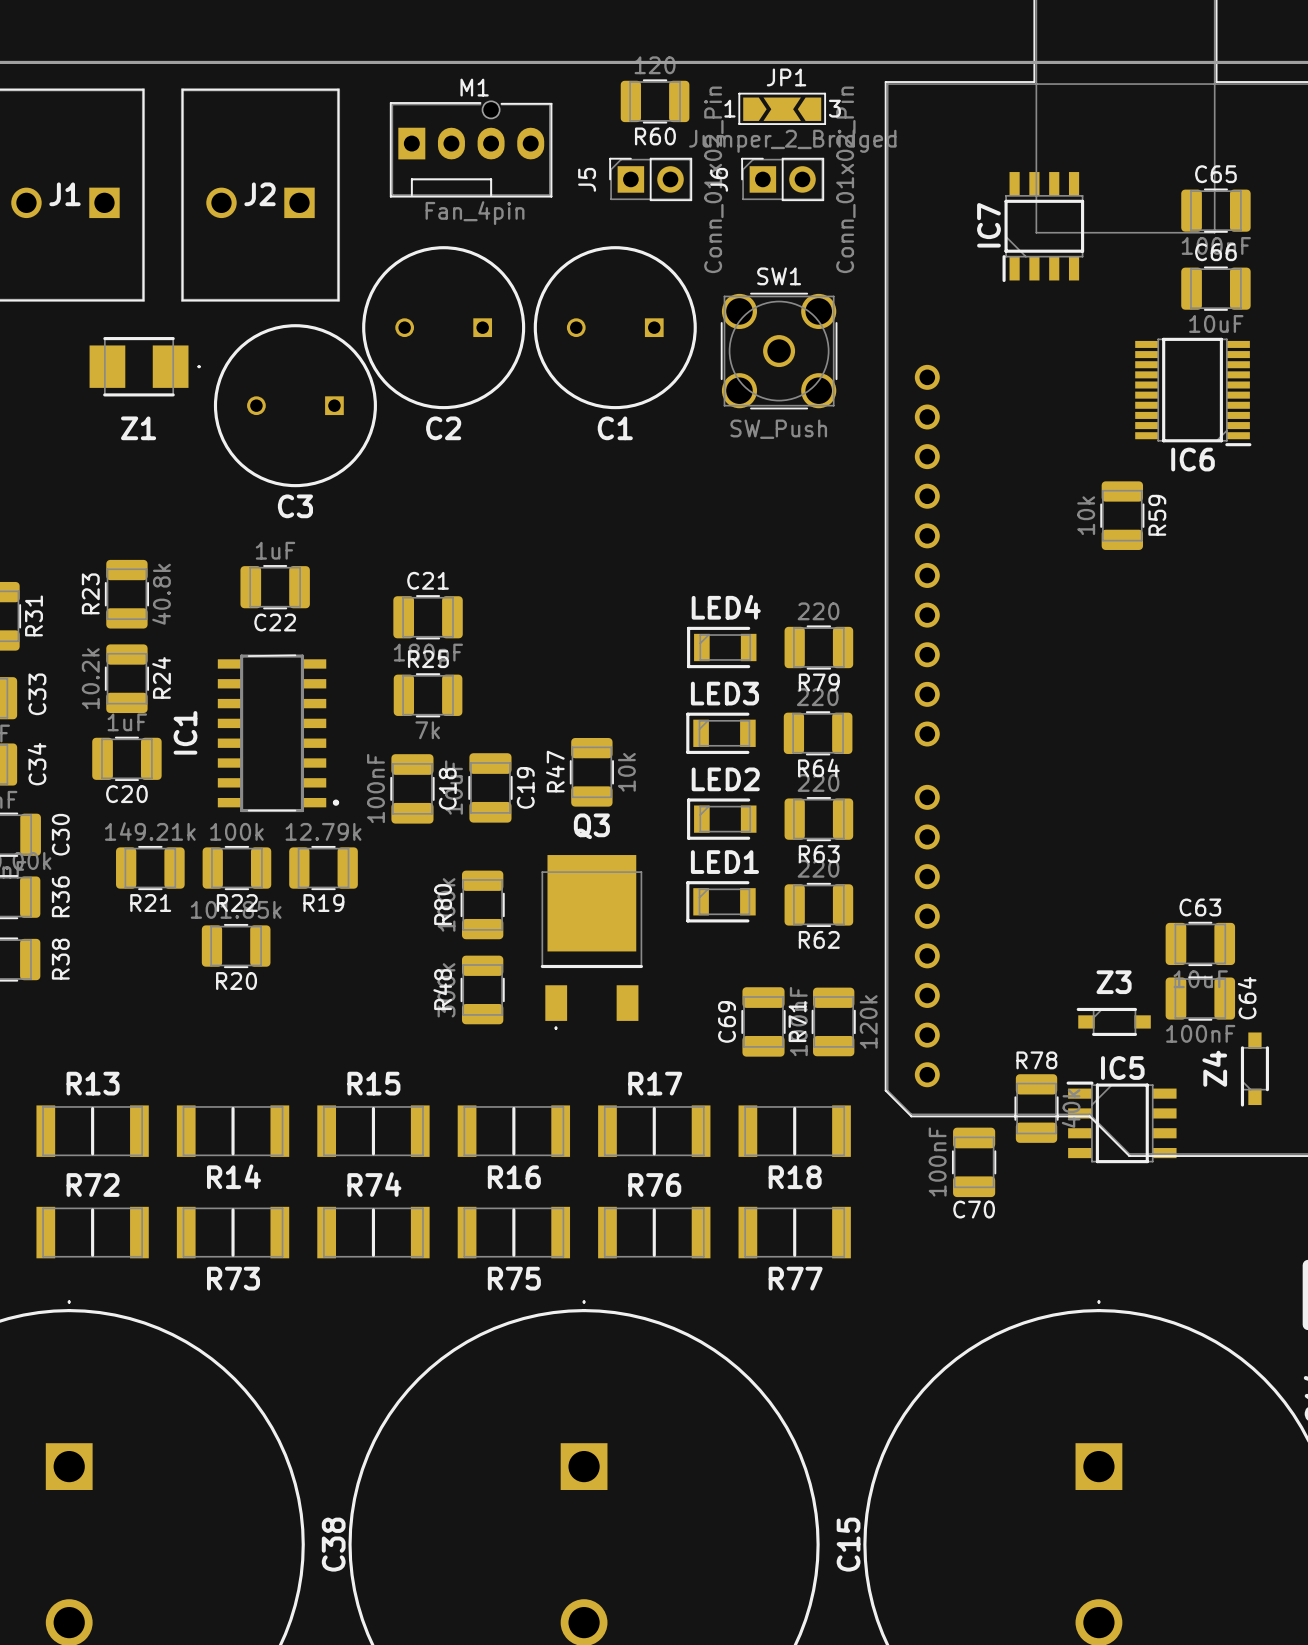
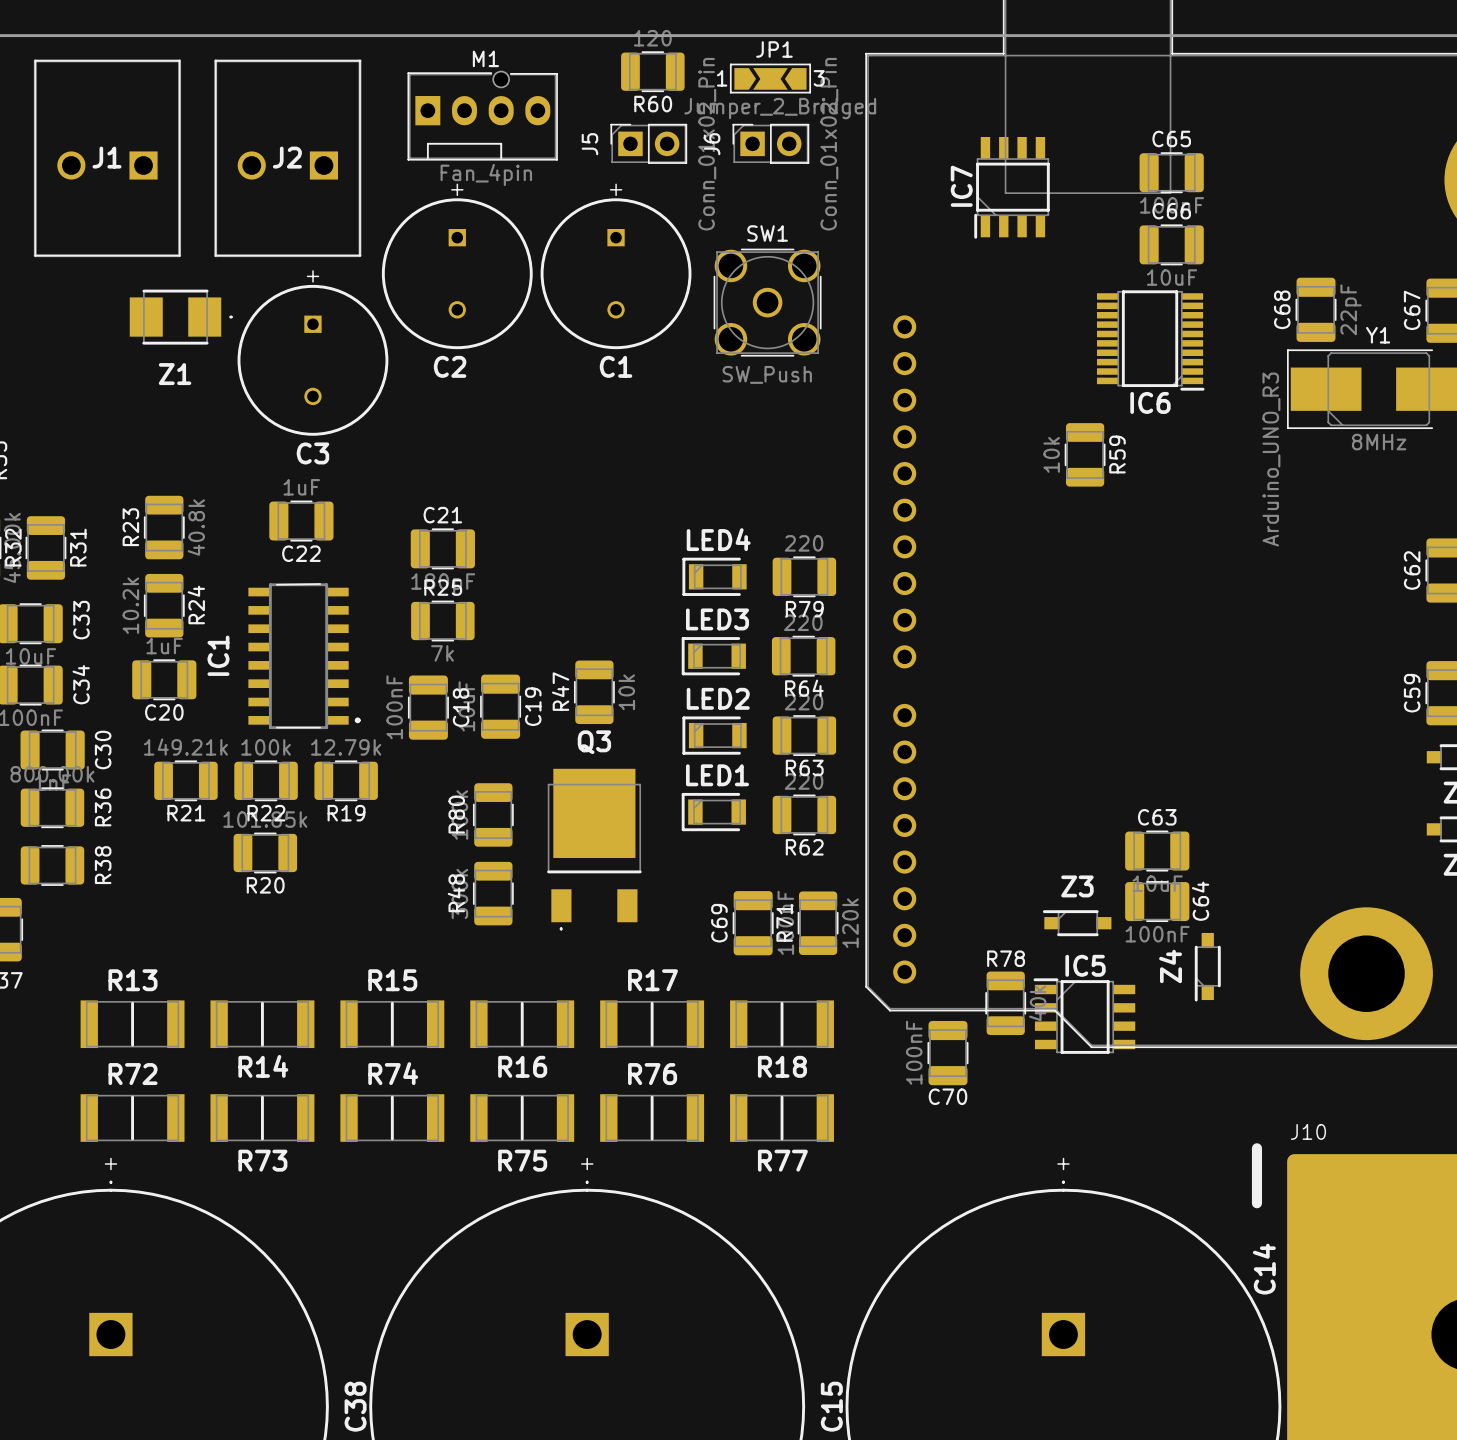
C2 footprint: [362, 246, 526, 410] -> [381, 198, 533, 350]
C1 footprint: [533, 246, 697, 410] -> [540, 198, 692, 350]
C3 footprint: [213, 324, 377, 488] -> [237, 284, 389, 436]
C38 text: none -> + (110, 1164)
C15 text: none -> + (587, 1164)
C14 text: none -> + (1063, 1164)

